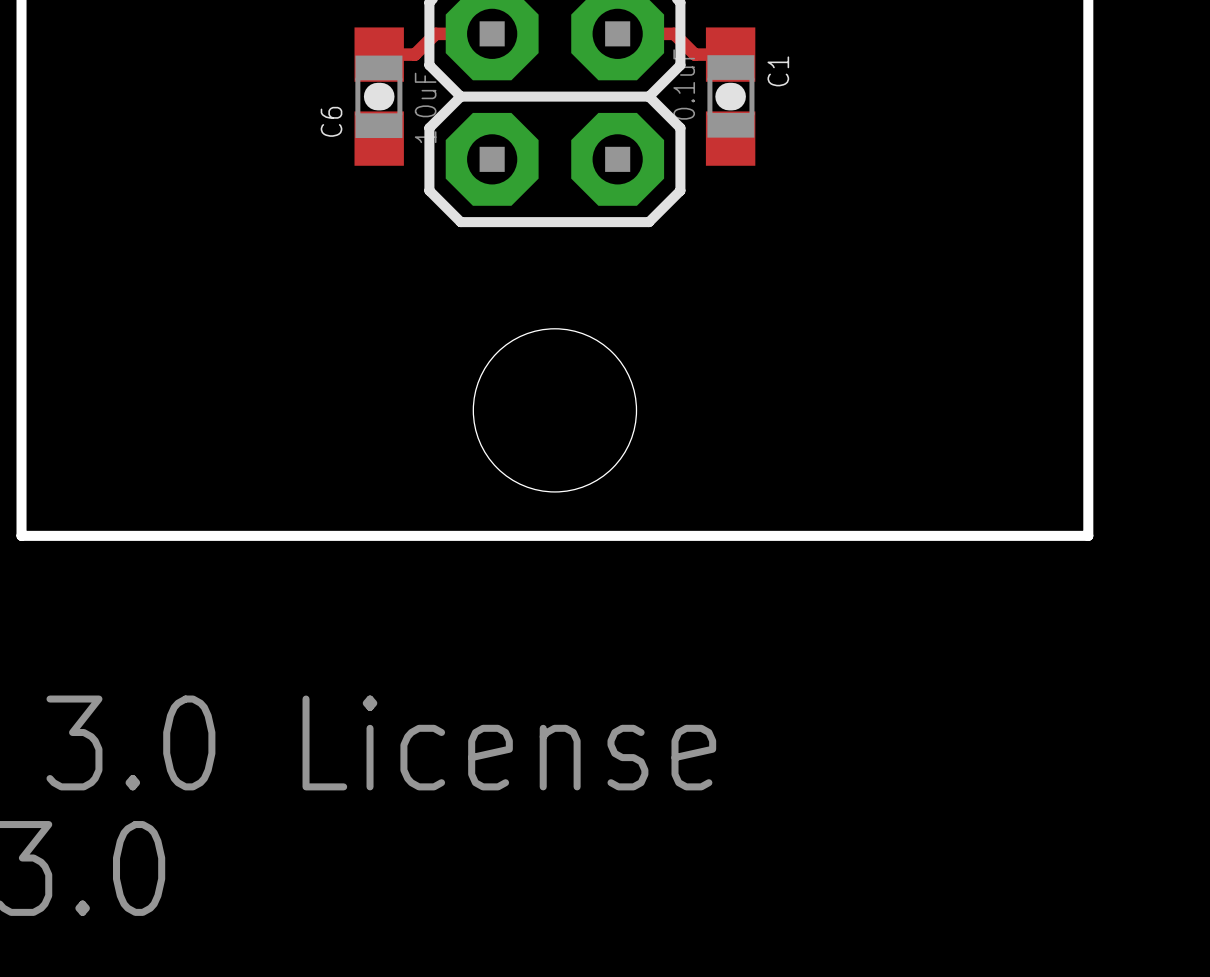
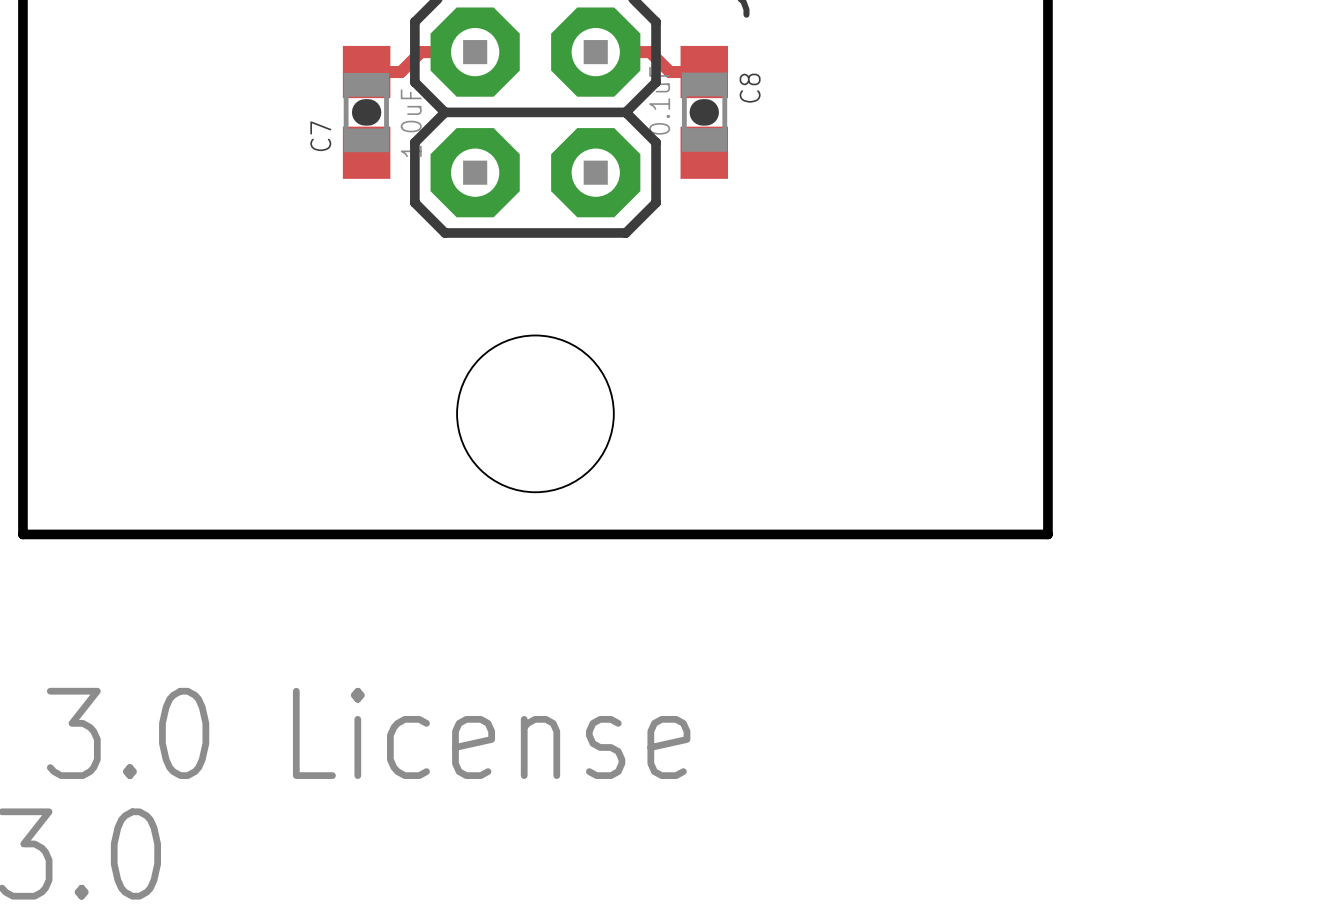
C1 name: C1 (778, 71) -> C8 (750, 88)
C6 name: C6 (331, 121) -> C7 (320, 136)

